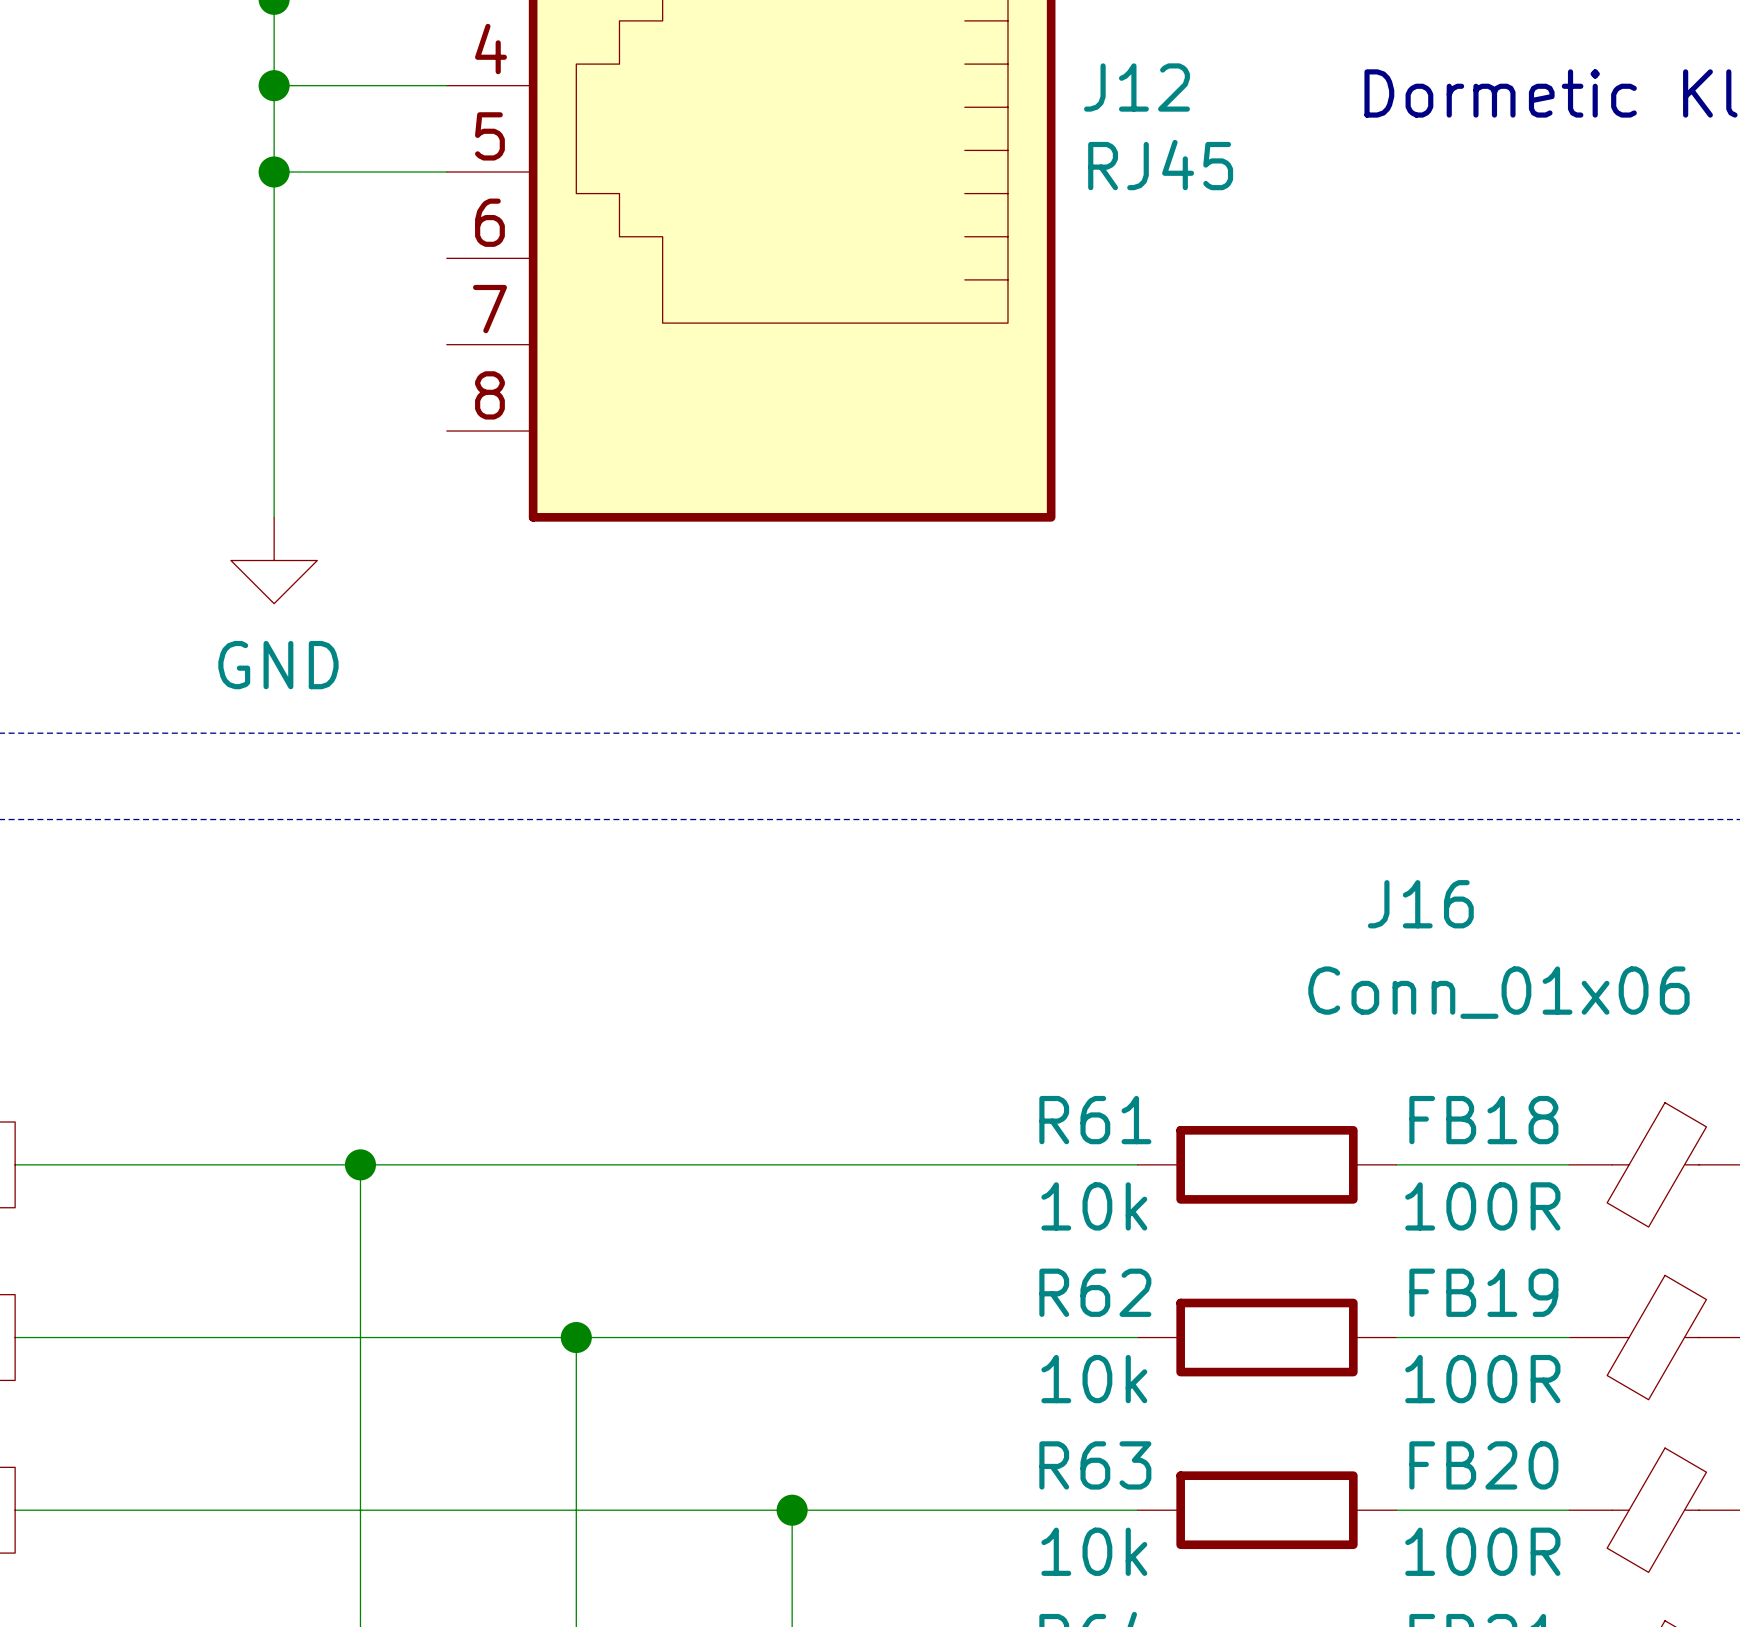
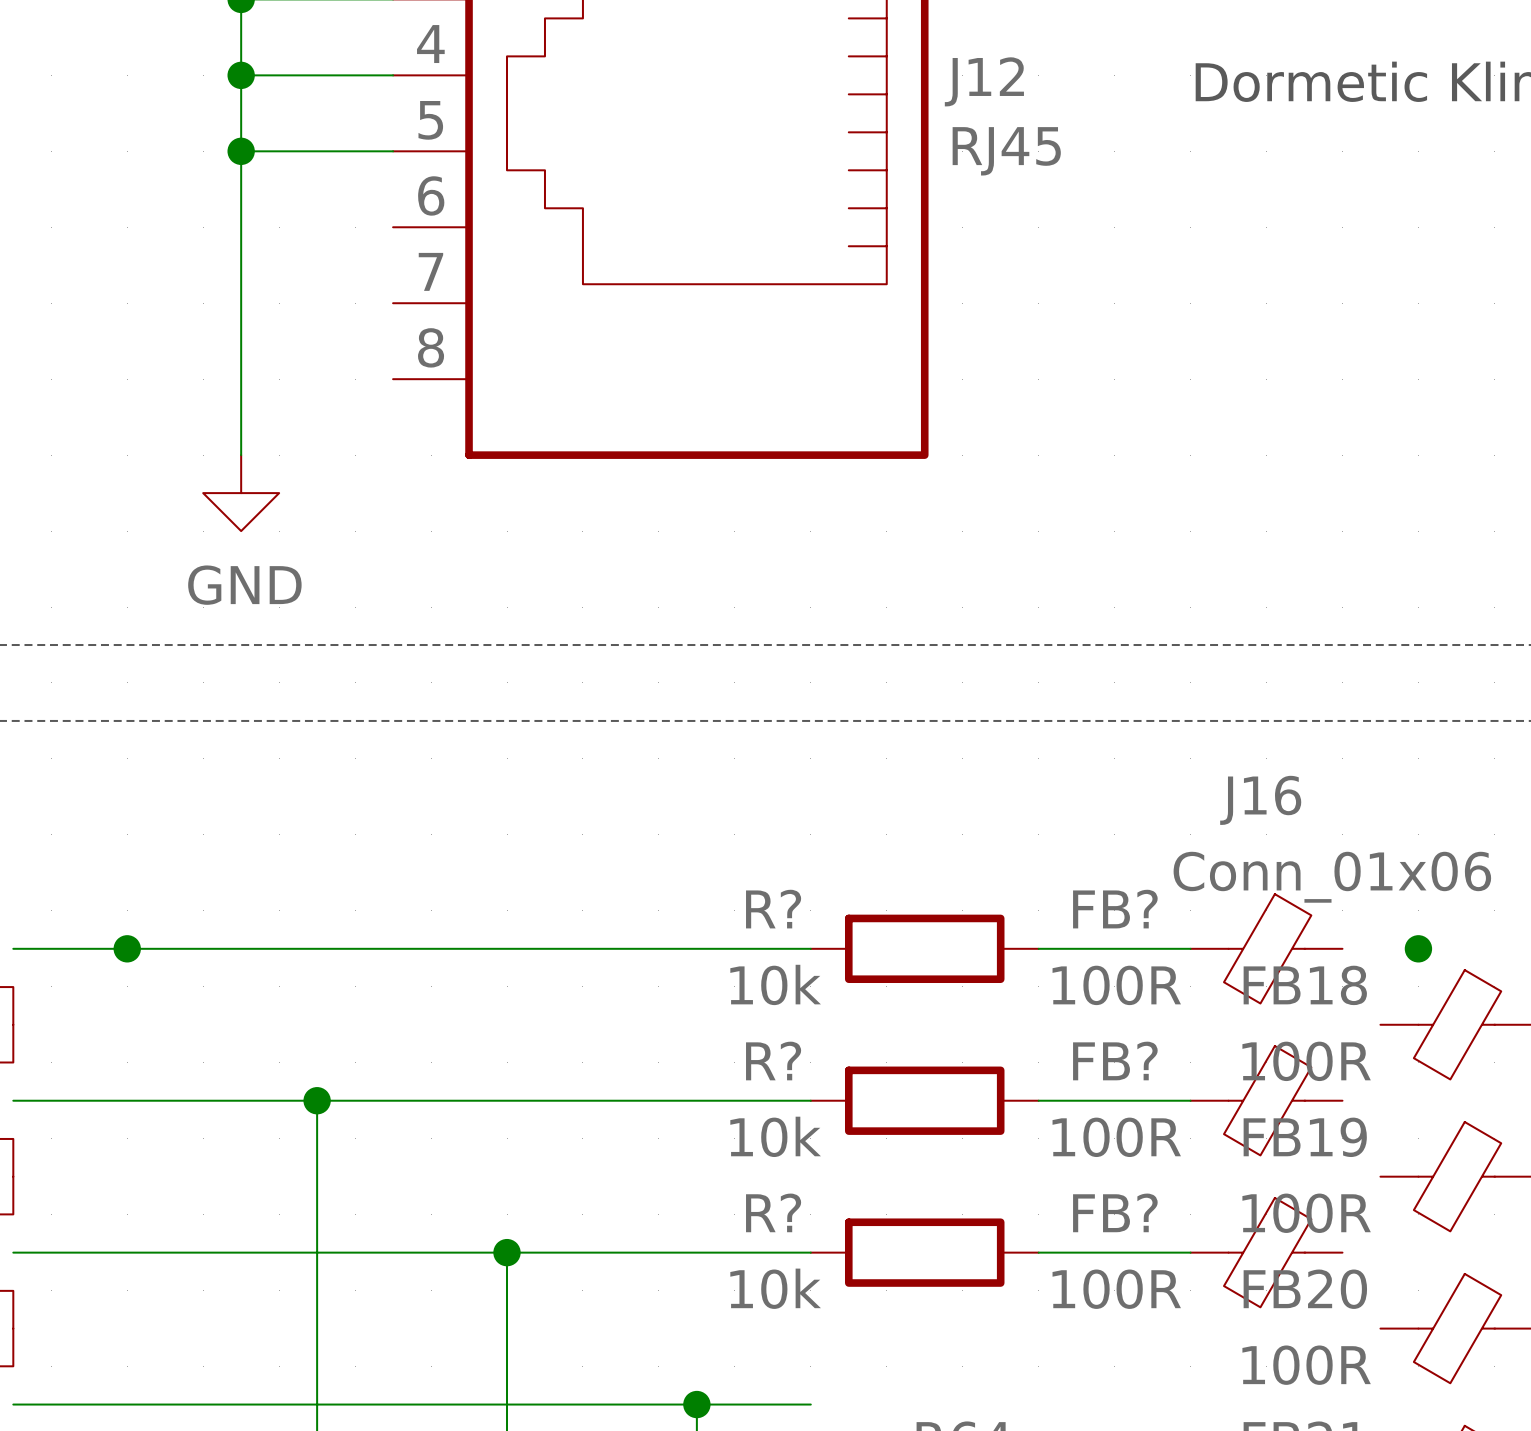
wire: none -> (13, 948) (810, 948)
junction: none -> (127, 948)
R?: none -> 10k (924, 948)
FB?: none -> 100R (1266, 948)
junction: none -> (1418, 948)
wire: (15, 1164) (1137, 1164) -> none
wire: (360, 1164) (360, 1251) -> none
junction position: (360, 1164) -> (317, 1100)
R61: 10k (1267, 1164) -> none
wire: (1396, 1164) (1569, 1164) -> (1038, 948) (1190, 948)
wire: none -> (13, 1100) (810, 1100)
R?: none -> 10k (924, 1100)
FB?: none -> 100R (1266, 1100)
wire: (15, 1337) (1137, 1337) -> none
wire: (576, 1337) (576, 1423) -> none
junction position: (576, 1337) -> (507, 1252)
R62: 10k (1267, 1337) -> none
wire: (1396, 1337) (1569, 1337) -> (1038, 1100) (1190, 1100)
wire: none -> (13, 1252) (810, 1252)
R?: none -> 10k (924, 1252)
FB?: none -> 100R (1266, 1252)
wire: (15, 1510) (1137, 1510) -> none
wire: (792, 1510) (792, 1596) -> none
junction position: (792, 1510) -> (696, 1404)
R63: 10k (1267, 1510) -> none
wire: (1396, 1510) (1569, 1510) -> (1038, 1252) (1190, 1252)
wire: none -> (13, 1404) (810, 1404)

